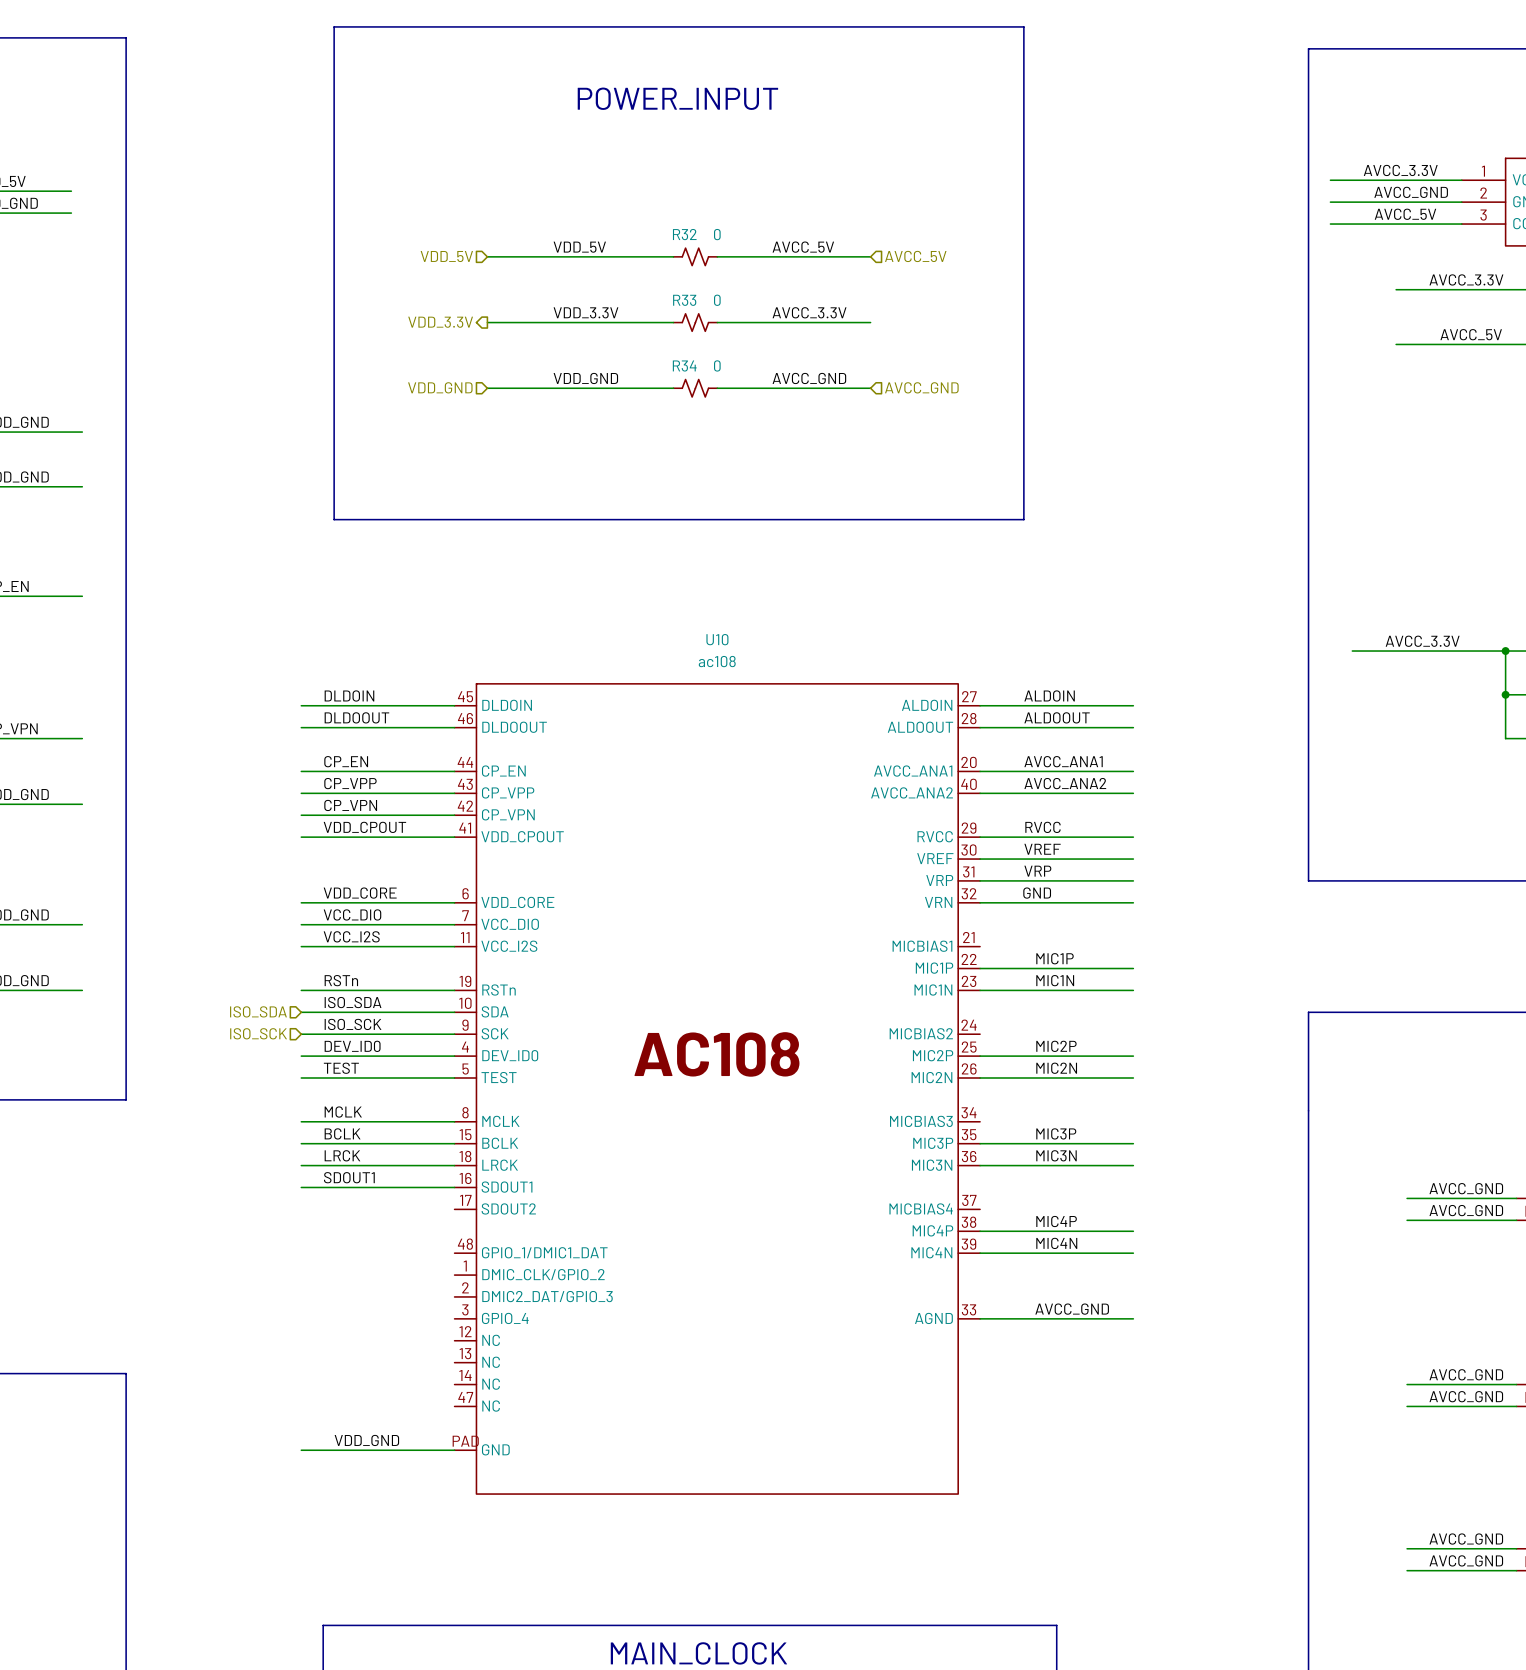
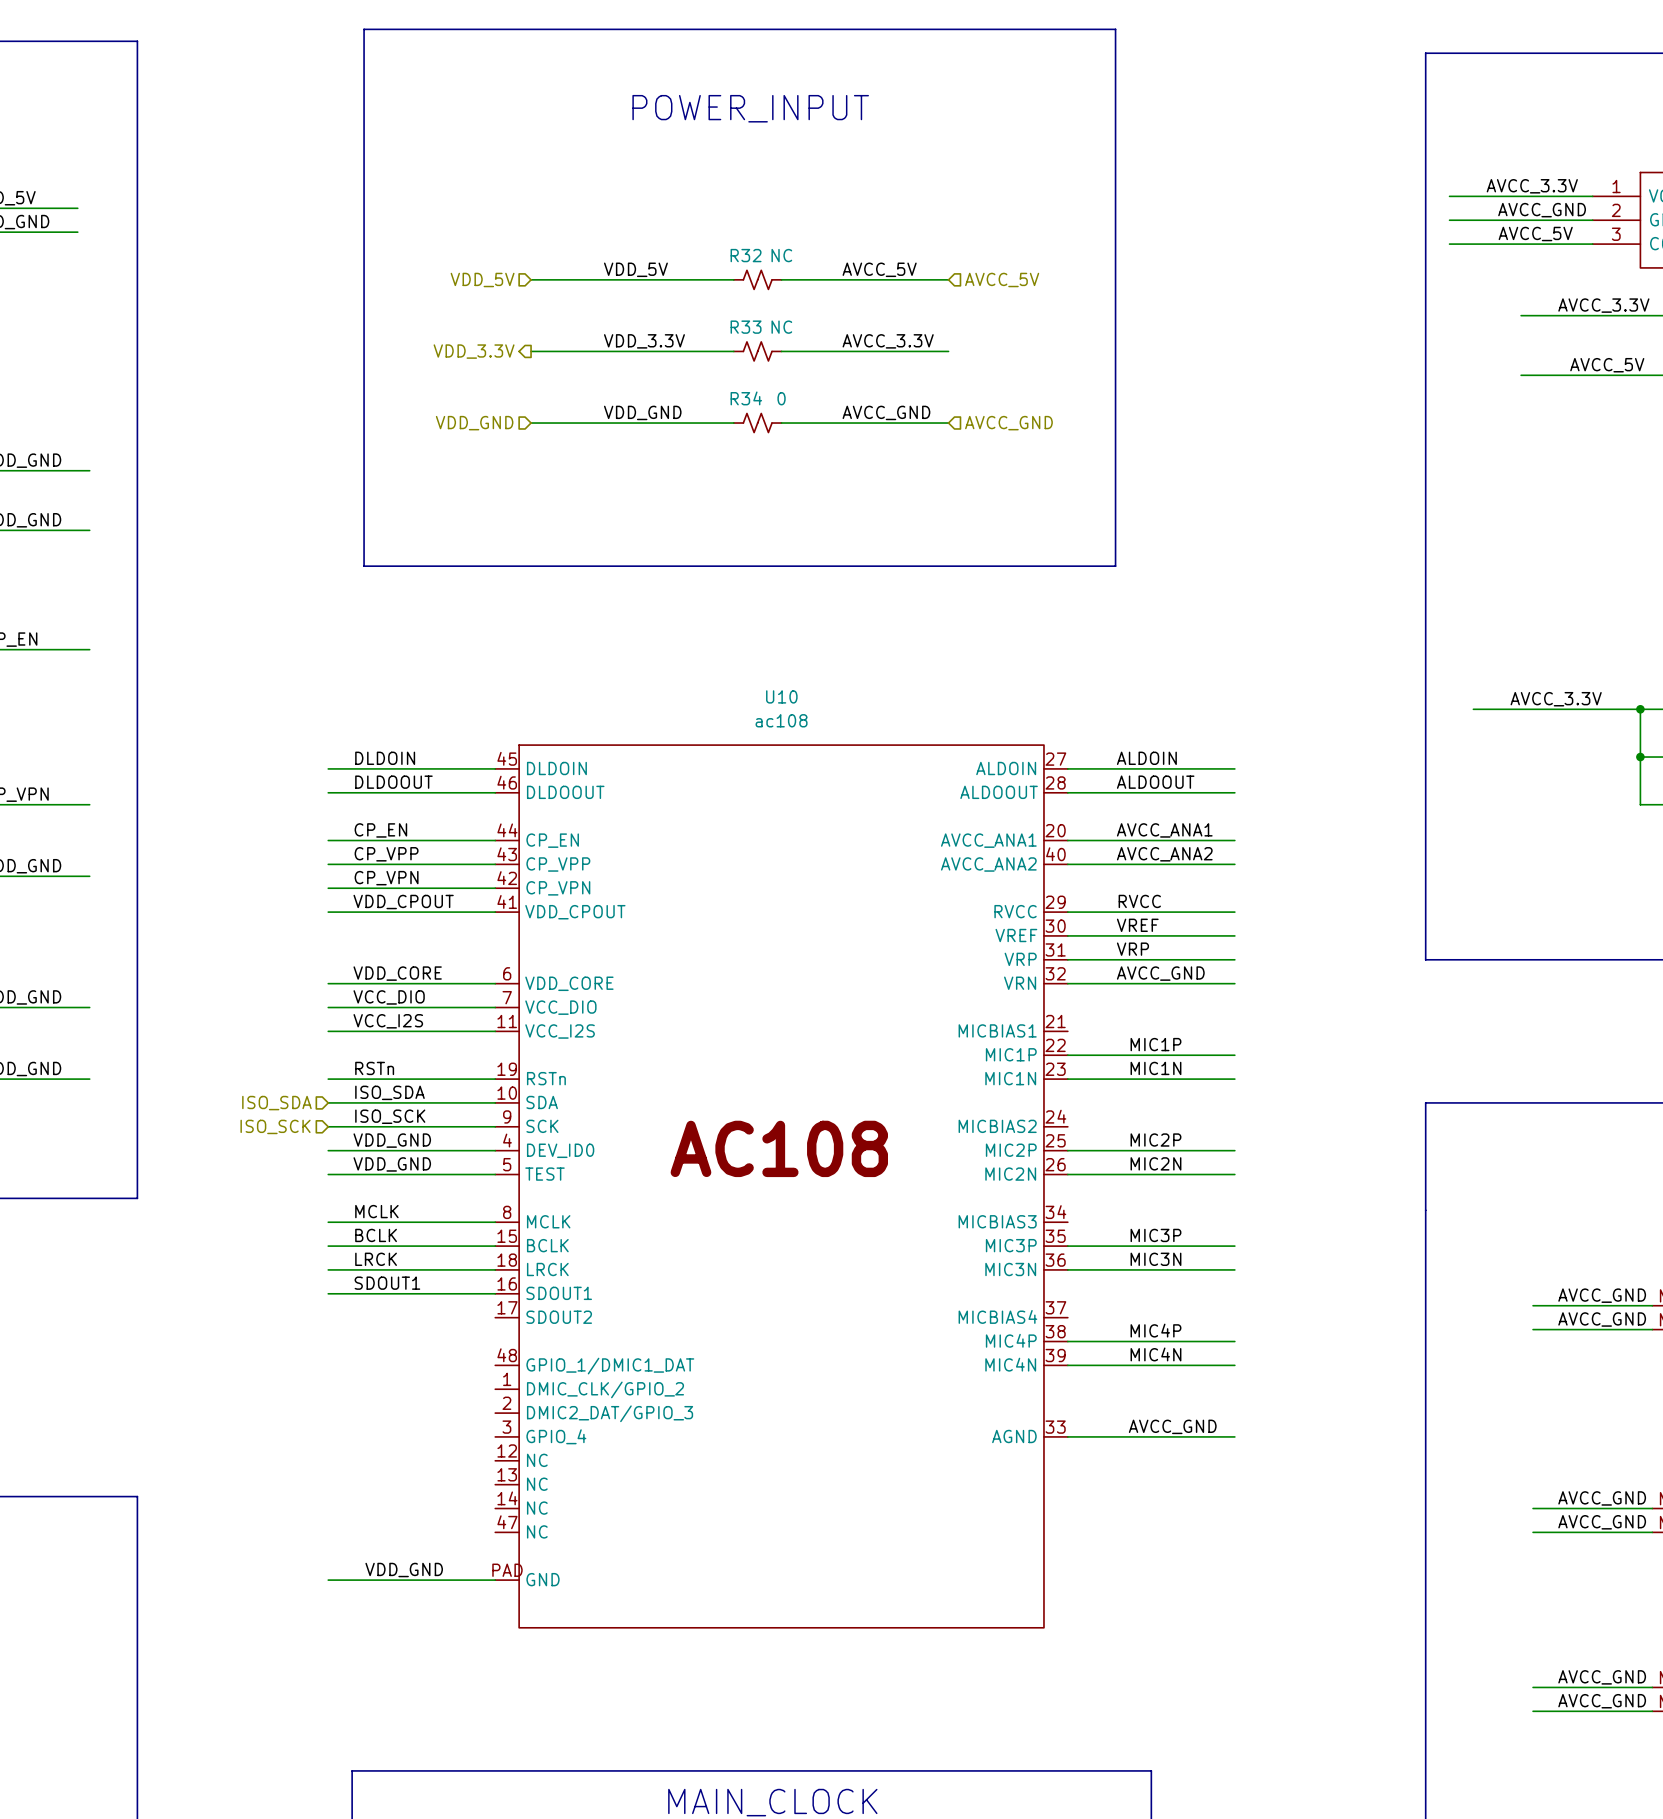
R32 value: 0 (717, 234) -> NC (781, 255)
R33 value: 0 (717, 300) -> NC (781, 327)
label: GND (1037, 893) -> AVCC_GND (1160, 973)
label: DEV_ID0 (352, 1046) -> VDD_GND (392, 1140)
label: TEST (341, 1068) -> VDD_GND (392, 1164)

